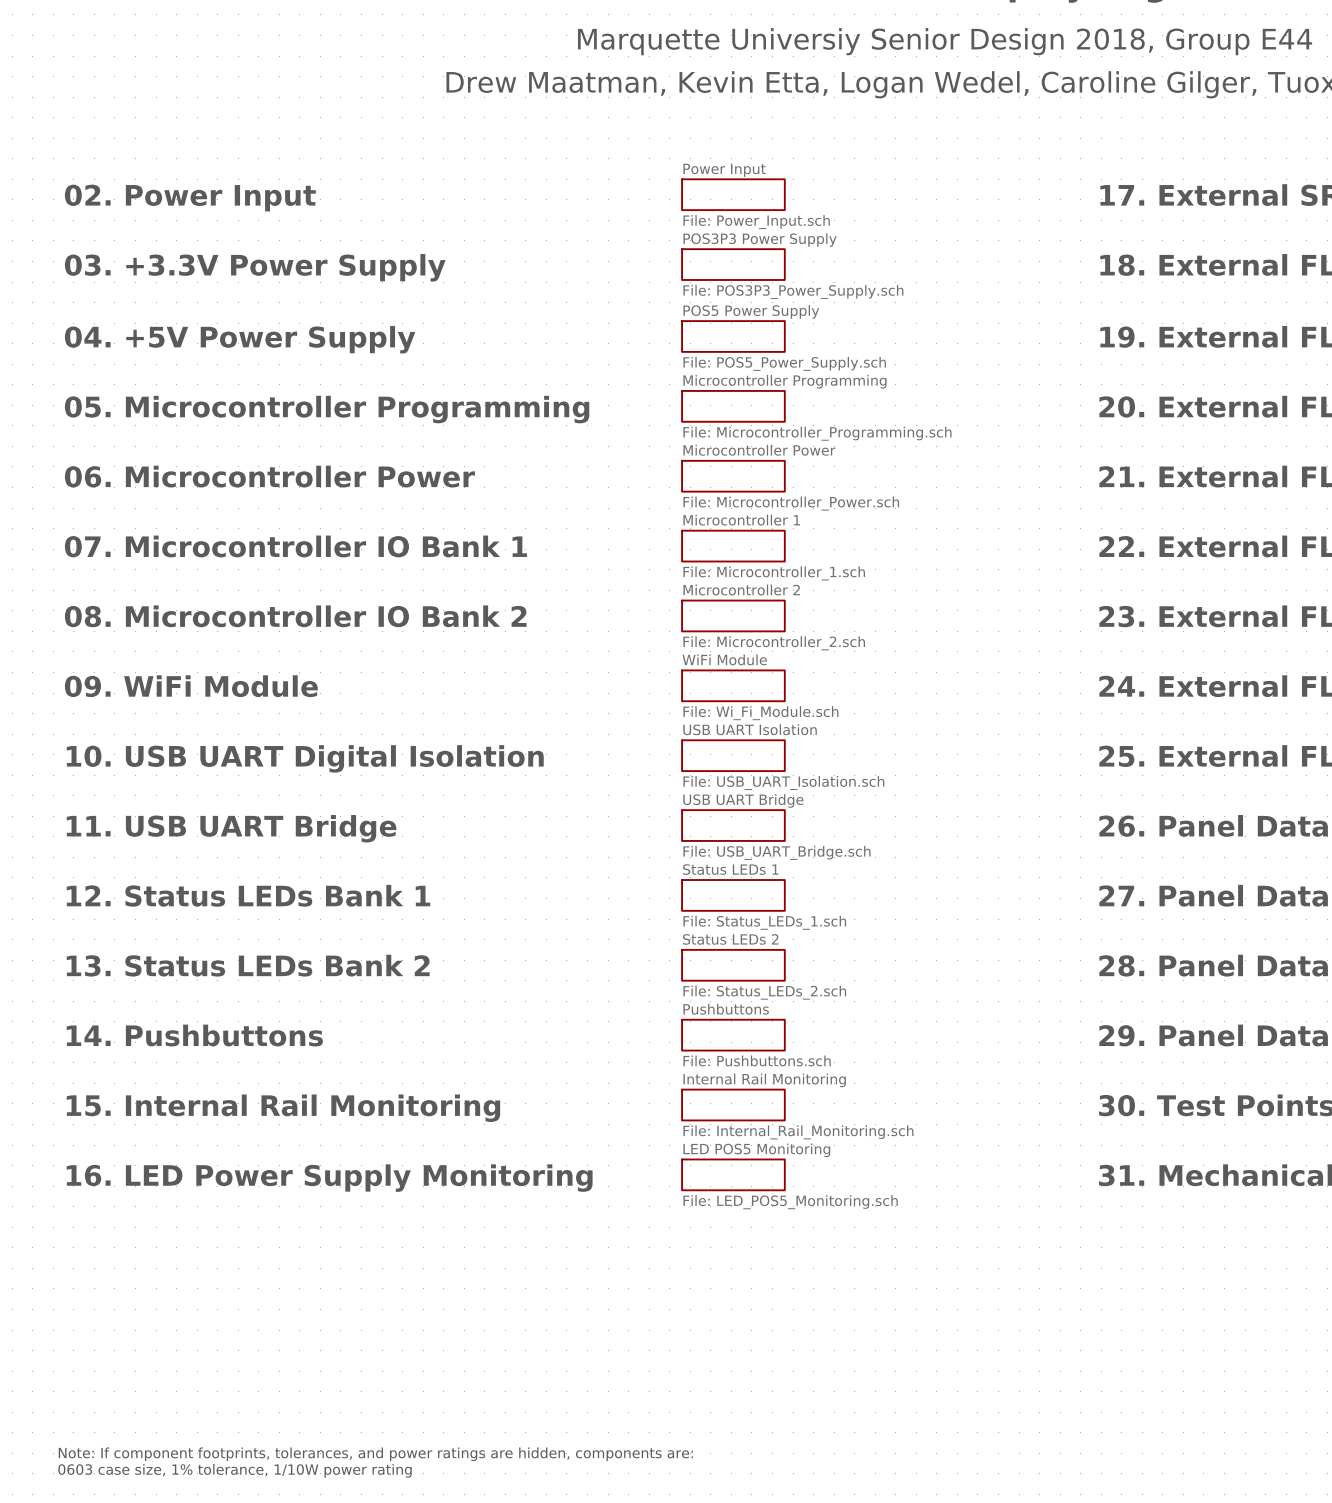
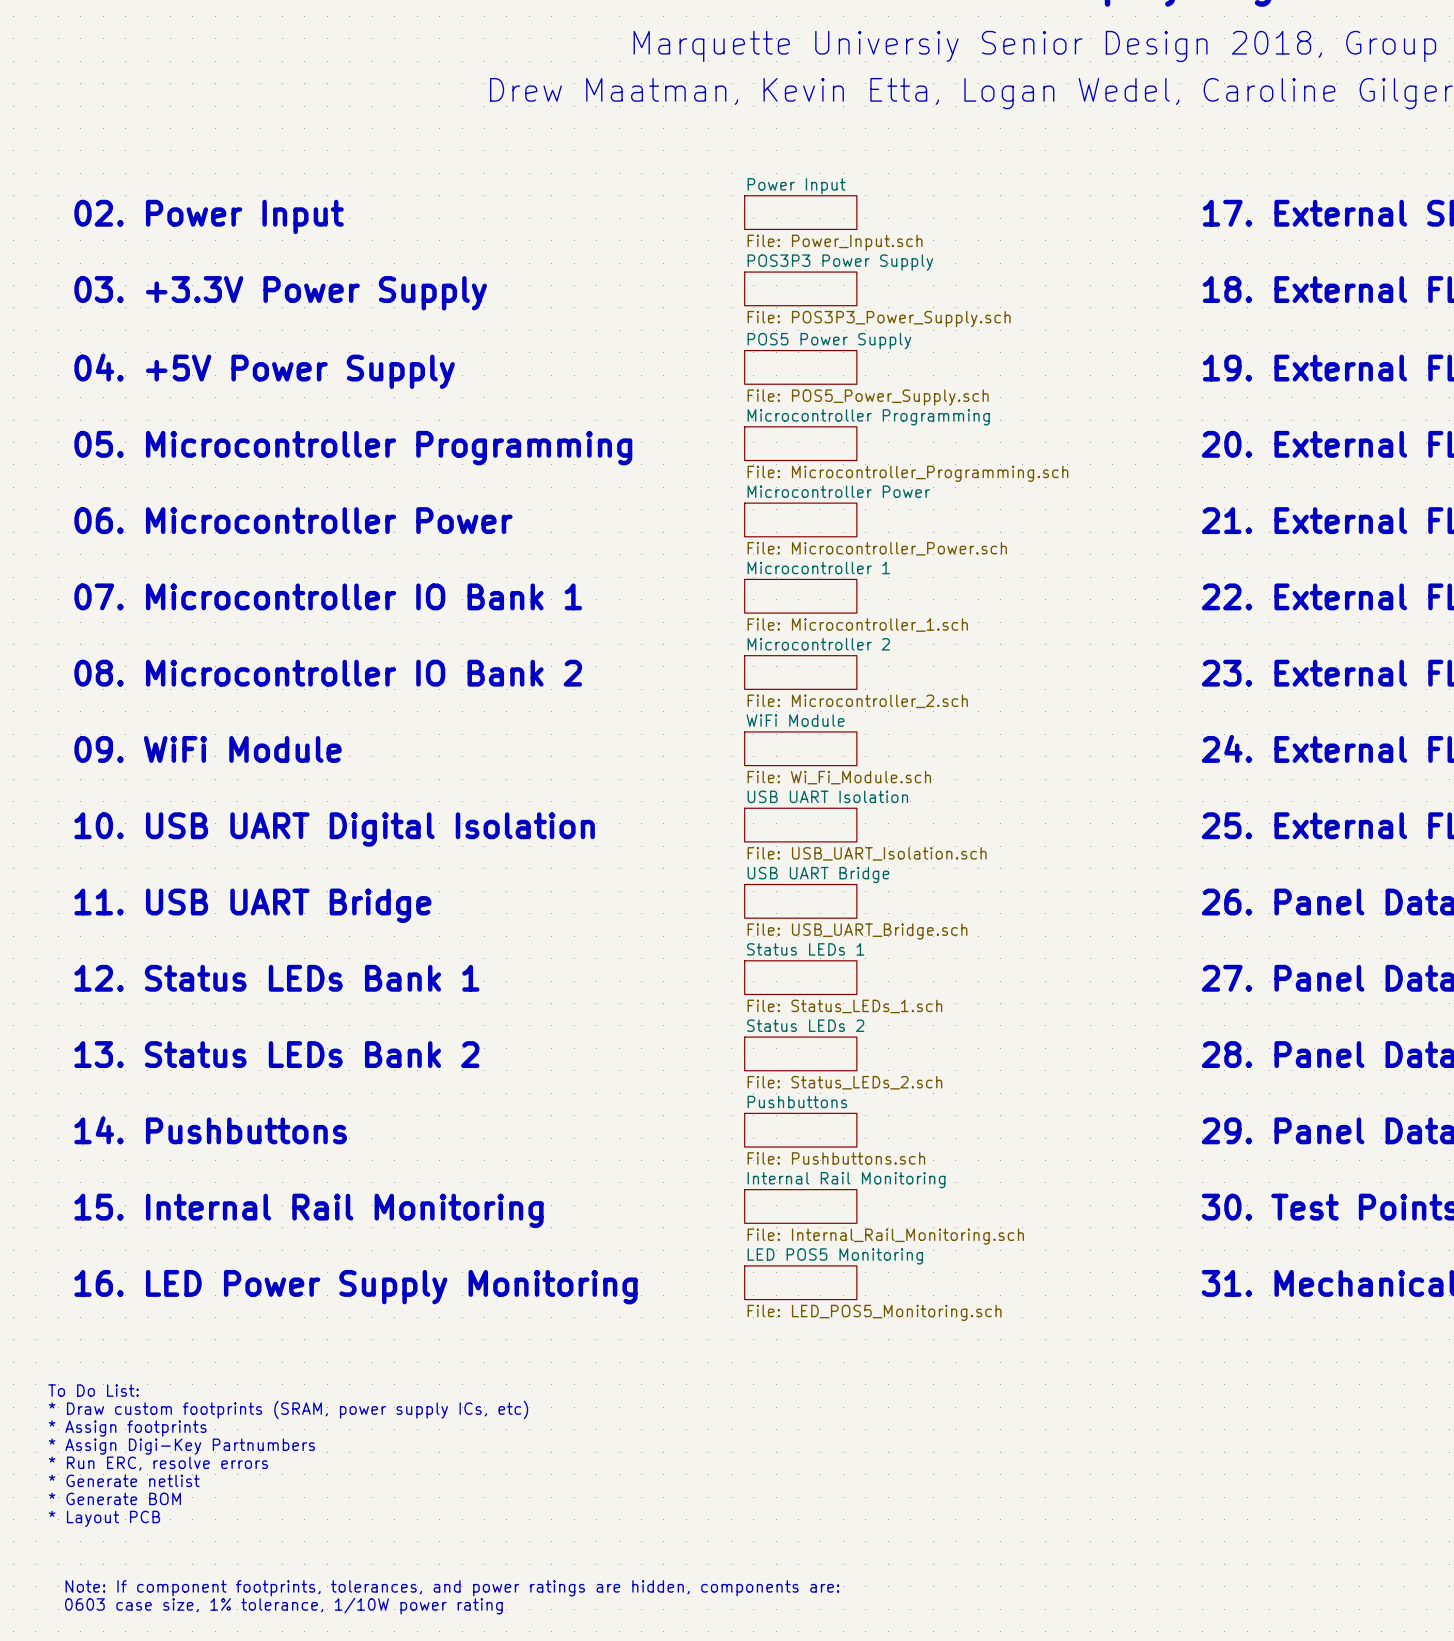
text: none -> To Do List: (93, 1390)
text: none -> * Draw custom footprints (SRAM, power supply ICs, etc) (288, 1409)
text: none -> * Assign footprints (127, 1428)
text: none -> * Assign Digi-Key Partnumbers (181, 1446)
text: none -> * Run ERC, resolve errors (158, 1463)
text: none -> * Generate netlist (124, 1480)
text: none -> * Generate BOM (114, 1498)
text: none -> * Layout PCB (104, 1518)

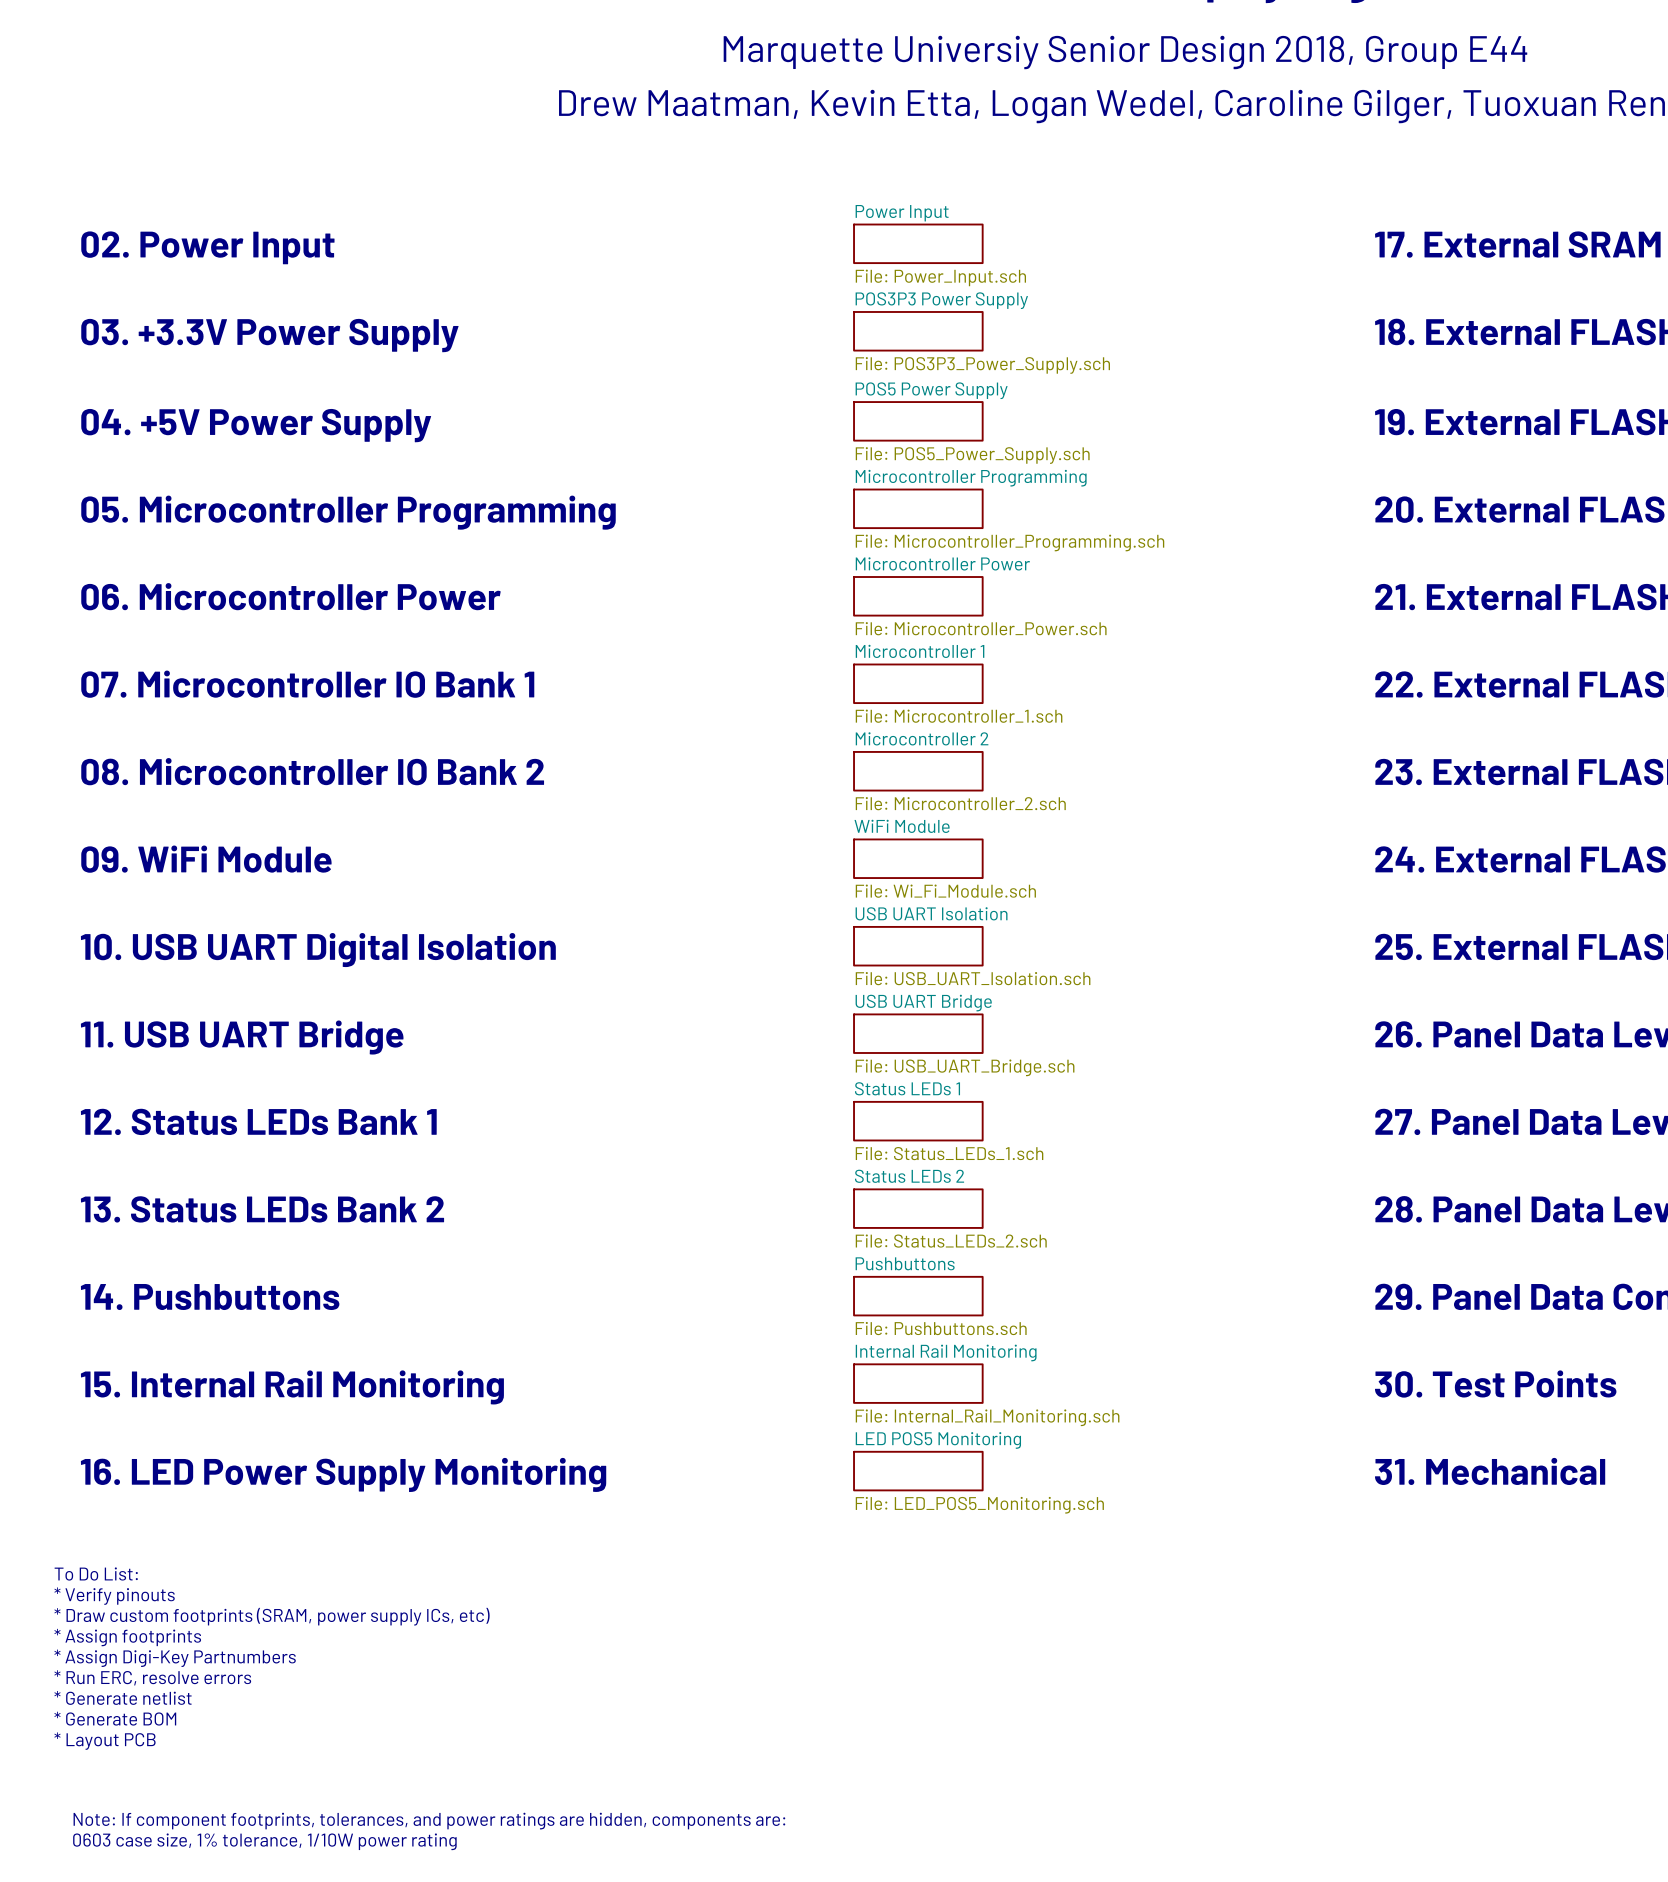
text: none -> To Do List: (96, 1574)
text: To Do List: (93, 1390) -> * Verify pinouts (114, 1596)

